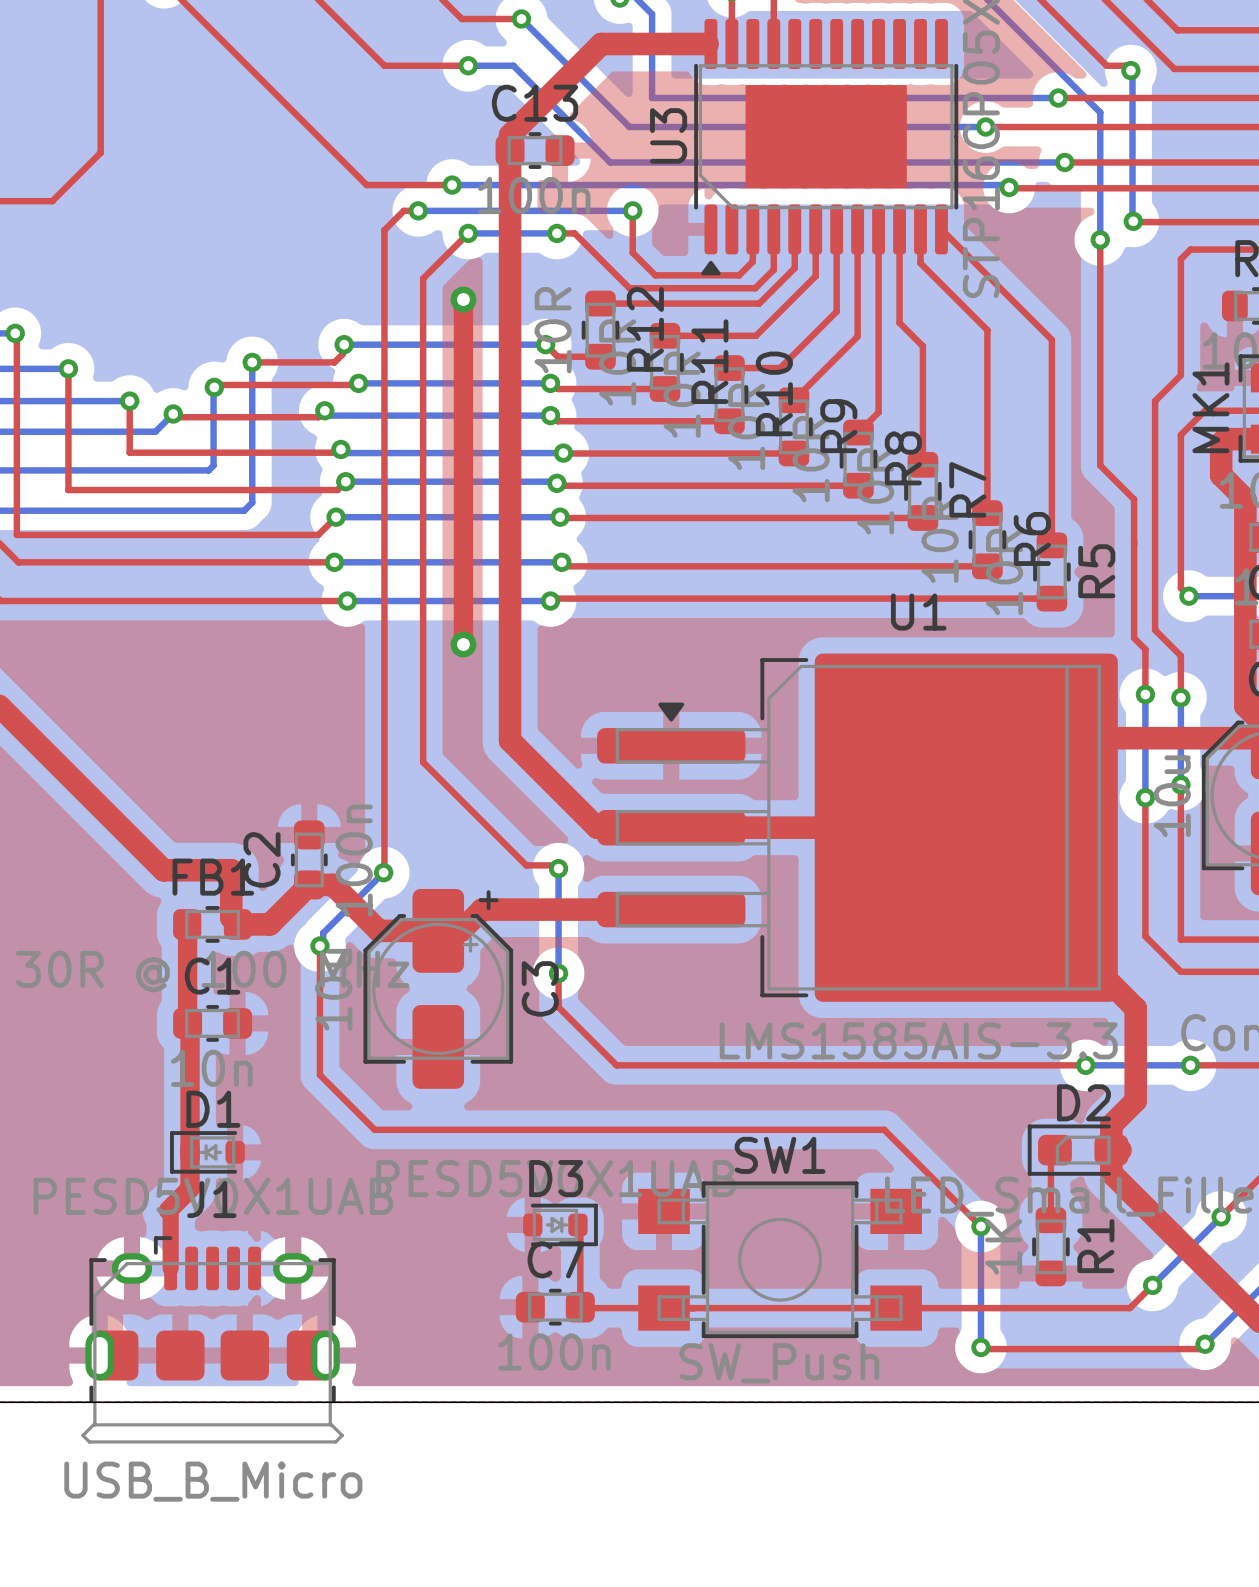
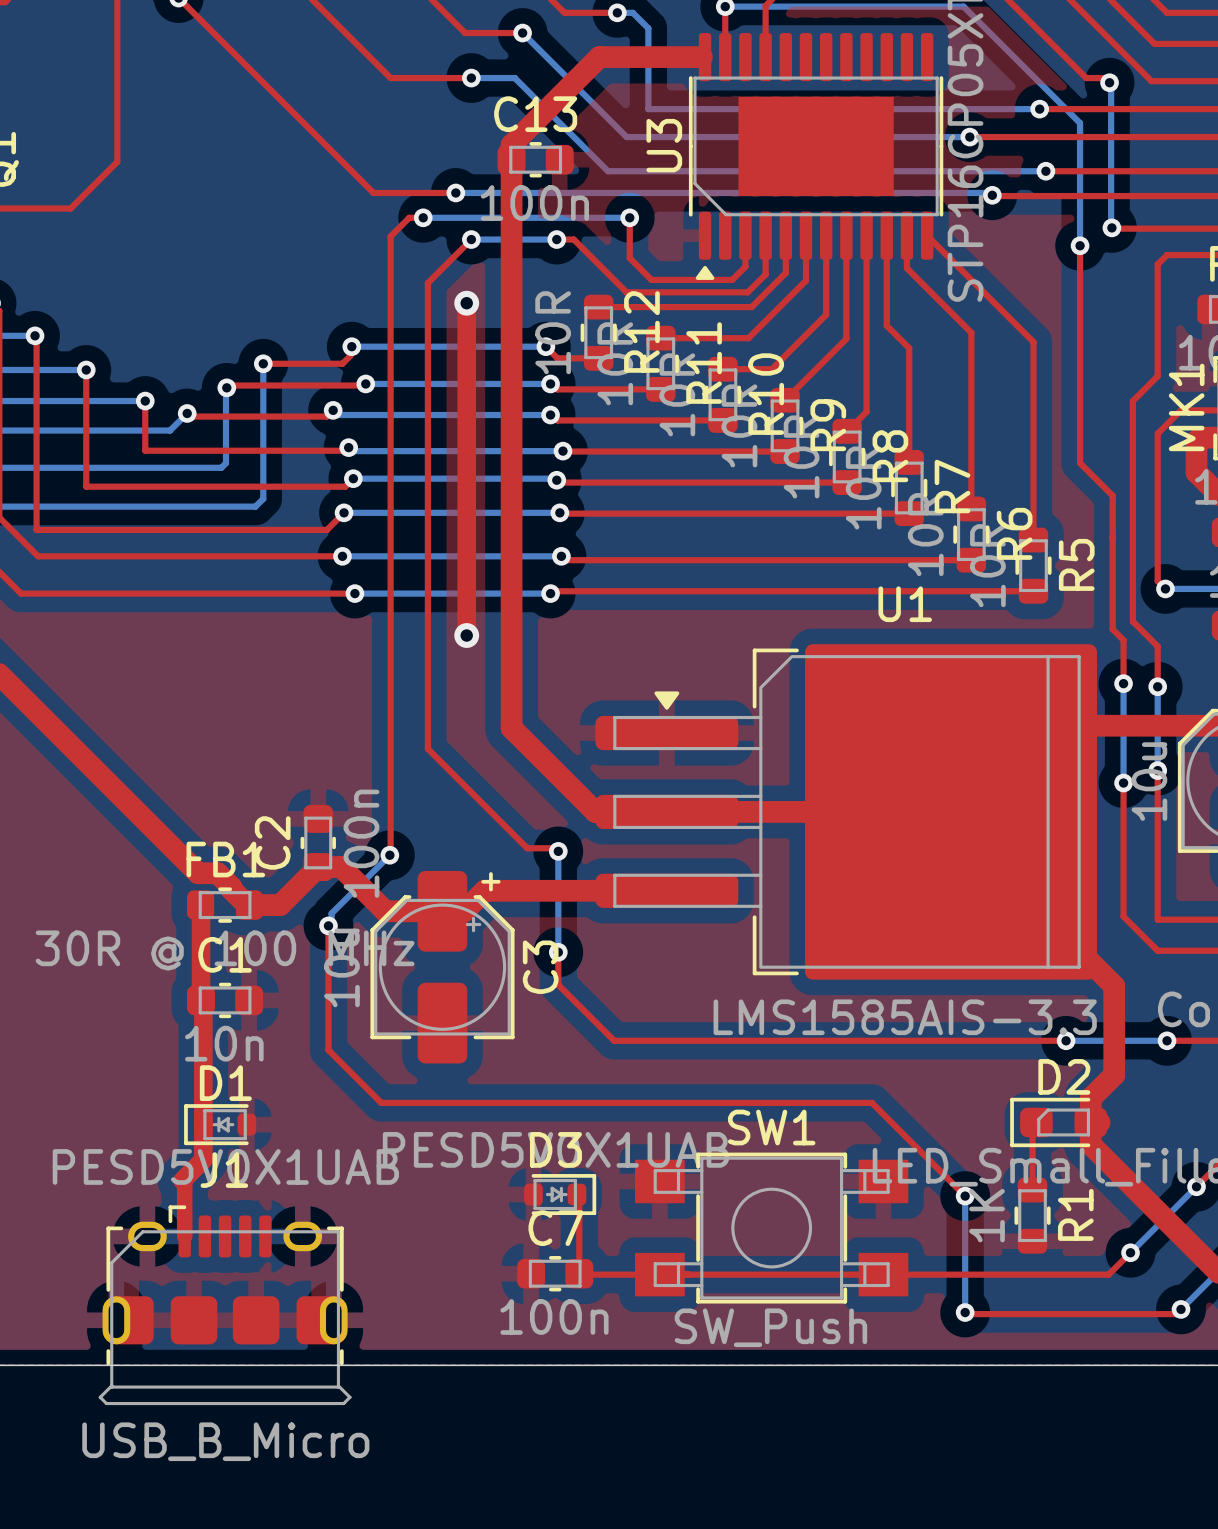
top track: (163, 870) (231, 870) (231, 917) (237, 924) -> (177, 852) (198, 873) (217, 873) (247, 905)

